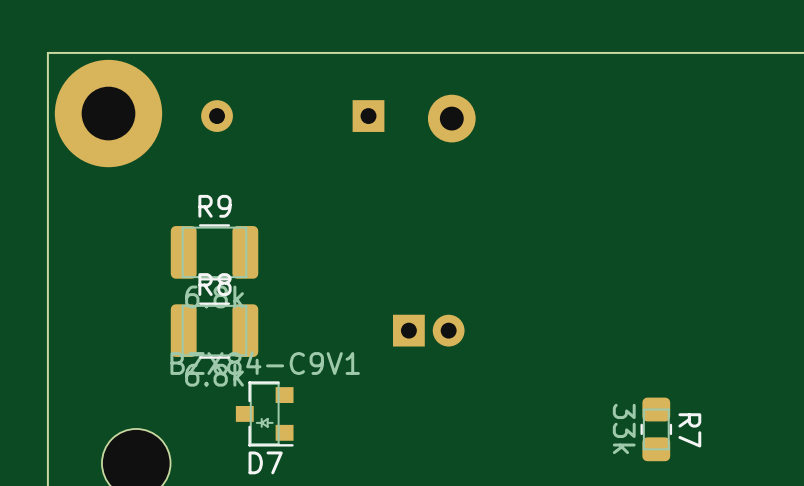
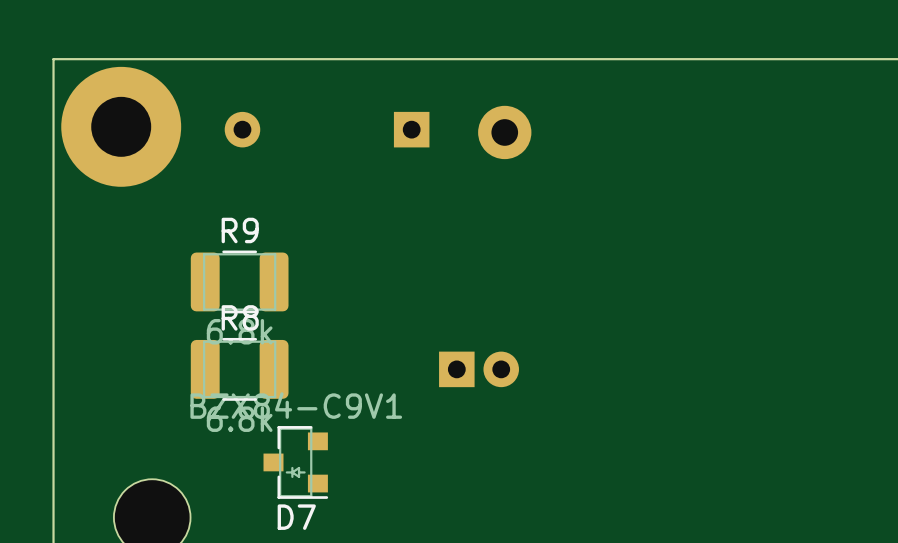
R7: 33k (656, 429) -> none

